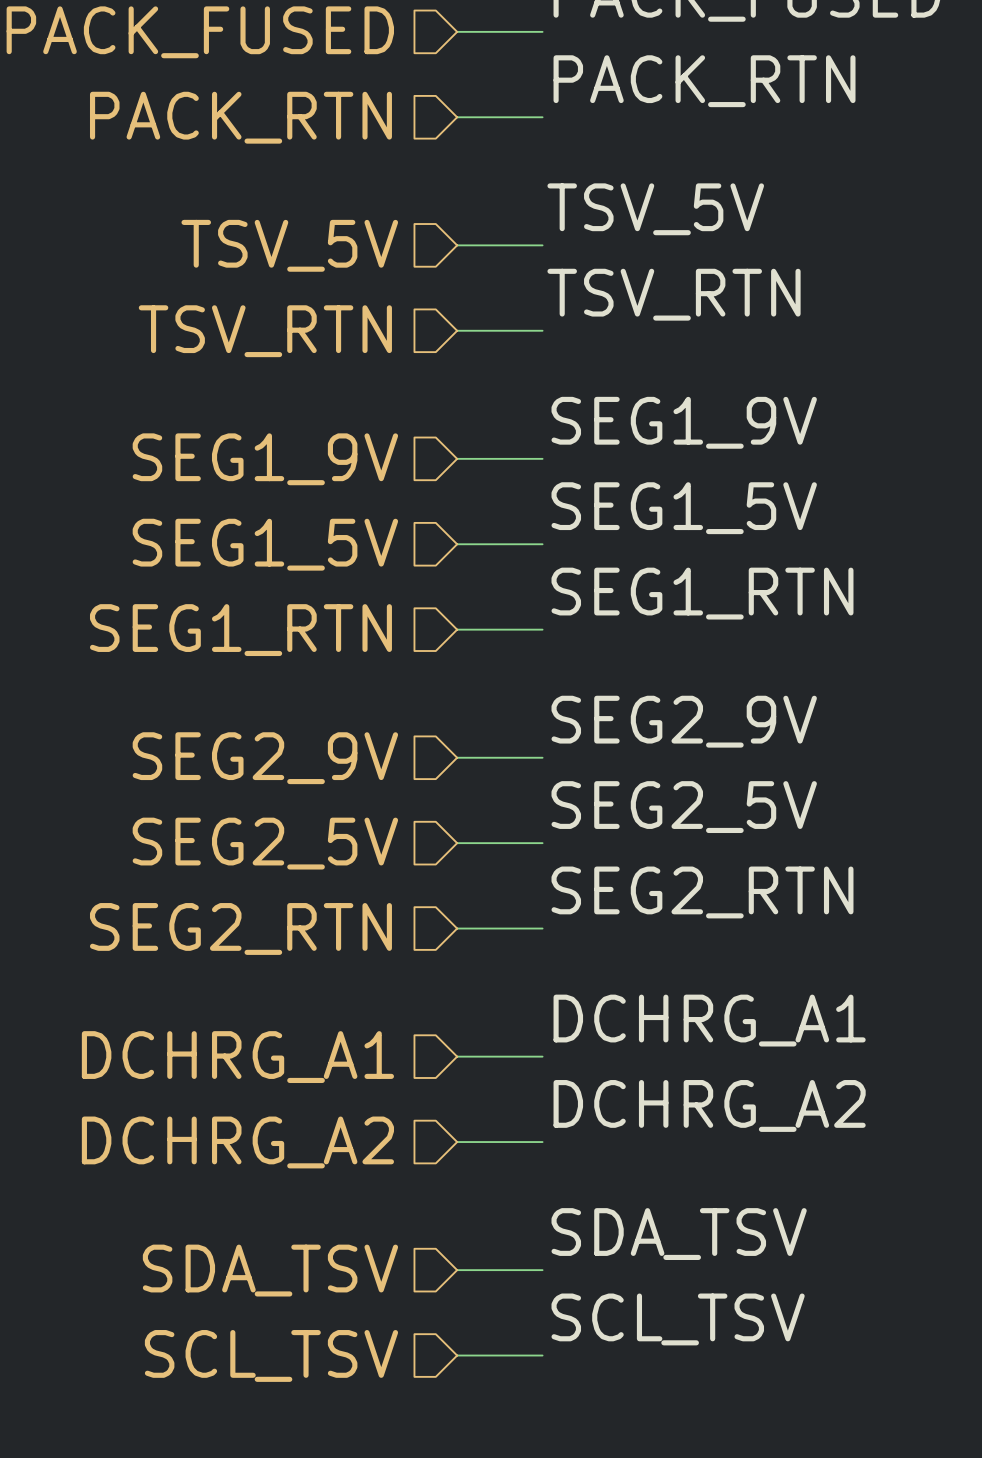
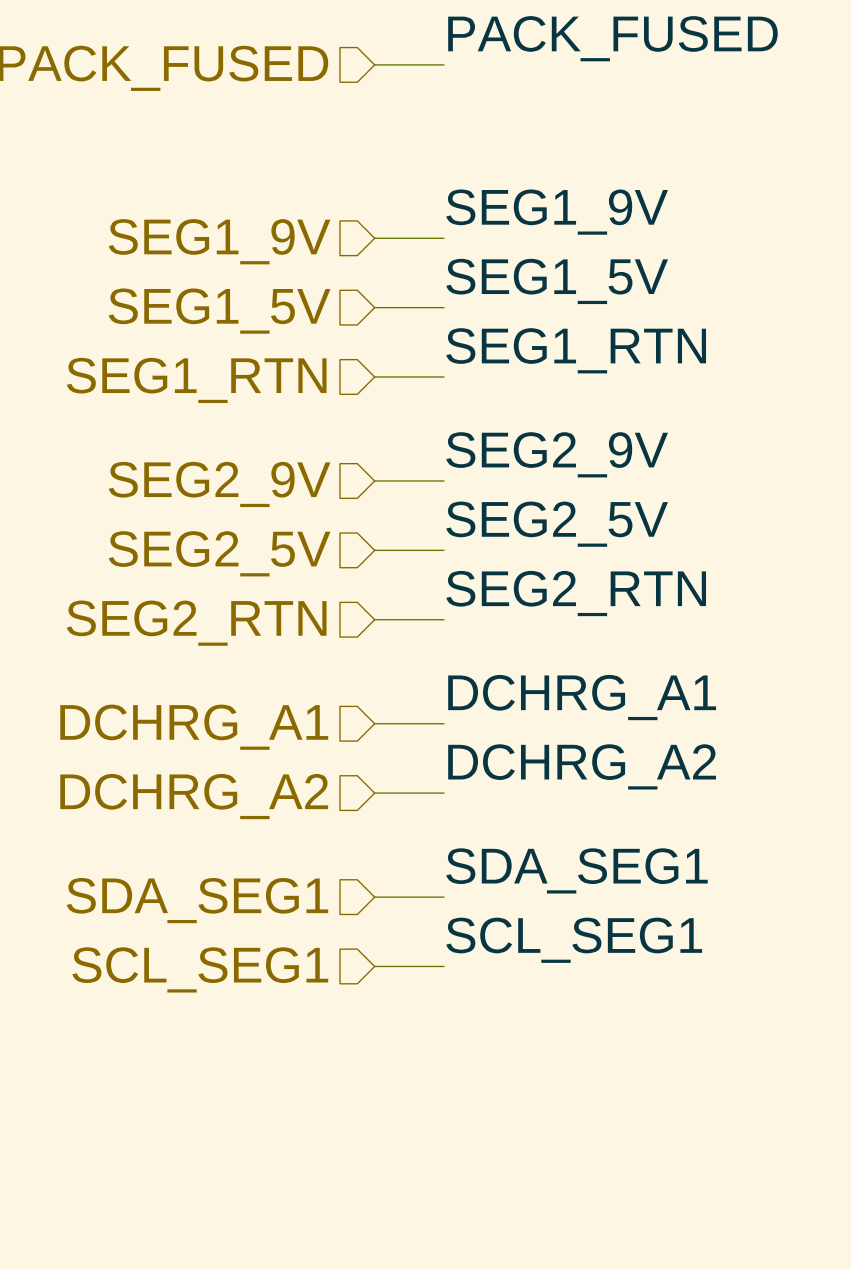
label: PACK_RTN (704, 81) -> none
hierarchical label: PACK_RTN (240, 117) -> none
wire: (457, 117) (542, 117) -> none
label: TSV_5V (655, 209) -> SEG1_9V (557, 212)
hierarchical label: TSV_5V (289, 245) -> SEG1_9V (219, 241)
label: TSV_RTN (674, 294) -> SEG1_5V (557, 281)
hierarchical label: TSV_RTN (265, 331) -> SEG1_5V (219, 311)
label: SEG1_9V (684, 422) -> SEG1_RTN (576, 350)
wire: (457, 458) (542, 458) -> (374, 376) (444, 376)
hierarchical label: SEG1_9V (265, 459) -> SEG1_RTN (196, 380)
label: SEG1_5V (684, 508) -> SEG2_9V (557, 454)
hierarchical label: SEG1_5V (265, 544) -> SEG2_9V (219, 484)
label: SEG1_RTN (702, 593) -> SEG2_5V (557, 524)
hierarchical label: SEG1_RTN (240, 630) -> SEG2_5V (219, 553)
label: SEG2_9V (684, 721) -> SEG2_RTN (576, 593)
wire: (457, 757) (542, 757) -> (374, 619) (444, 619)
hierarchical label: SEG2_9V (265, 758) -> SEG2_RTN (196, 623)
label: SEG2_5V (684, 807) -> DCHRG_A1 (582, 697)
hierarchical label: SEG2_5V (265, 843) -> DCHRG_A1 (194, 727)
label: SEG2_RTN (702, 892) -> DCHRG_A2 (582, 766)
hierarchical label: SEG2_RTN (240, 928) -> DCHRG_A2 (194, 796)
label: DCHRG_A1 (709, 1020) -> SDA_SEG1 (577, 870)
hierarchical label: DCHRG_A1 (237, 1057) -> SDA_SEG1 (197, 900)
label: DCHRG_A2 (709, 1105) -> SCL_SEG1 (574, 940)
hierarchical label: DCHRG_A2 (237, 1142) -> SCL_SEG1 (200, 969)
label: SDA_TSV (679, 1234) -> none
hierarchical label: SDA_TSV (270, 1270) -> none
wire: (457, 1270) (542, 1270) -> none
label: SCL_TSV (678, 1319) -> none
hierarchical label: SCL_TSV (271, 1355) -> none
wire: (457, 1355) (542, 1355) -> none

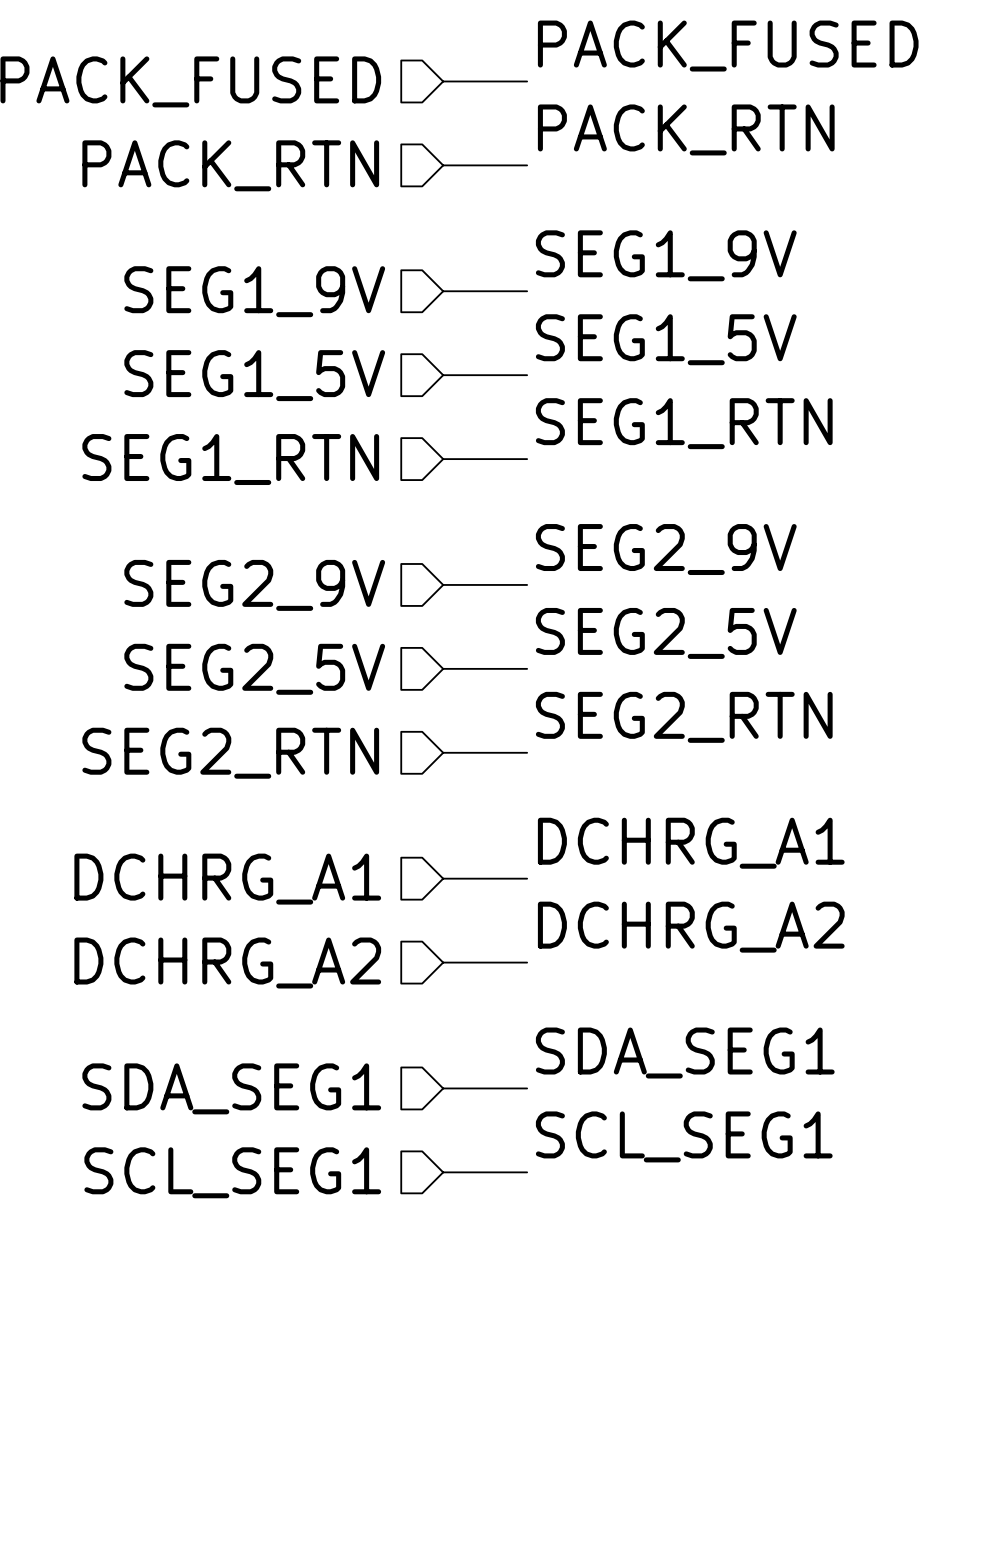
label: none -> PACK_RTN (686, 129)
wire: none -> (443, 165) (527, 165)
hierarchical label: none -> PACK_RTN (230, 165)

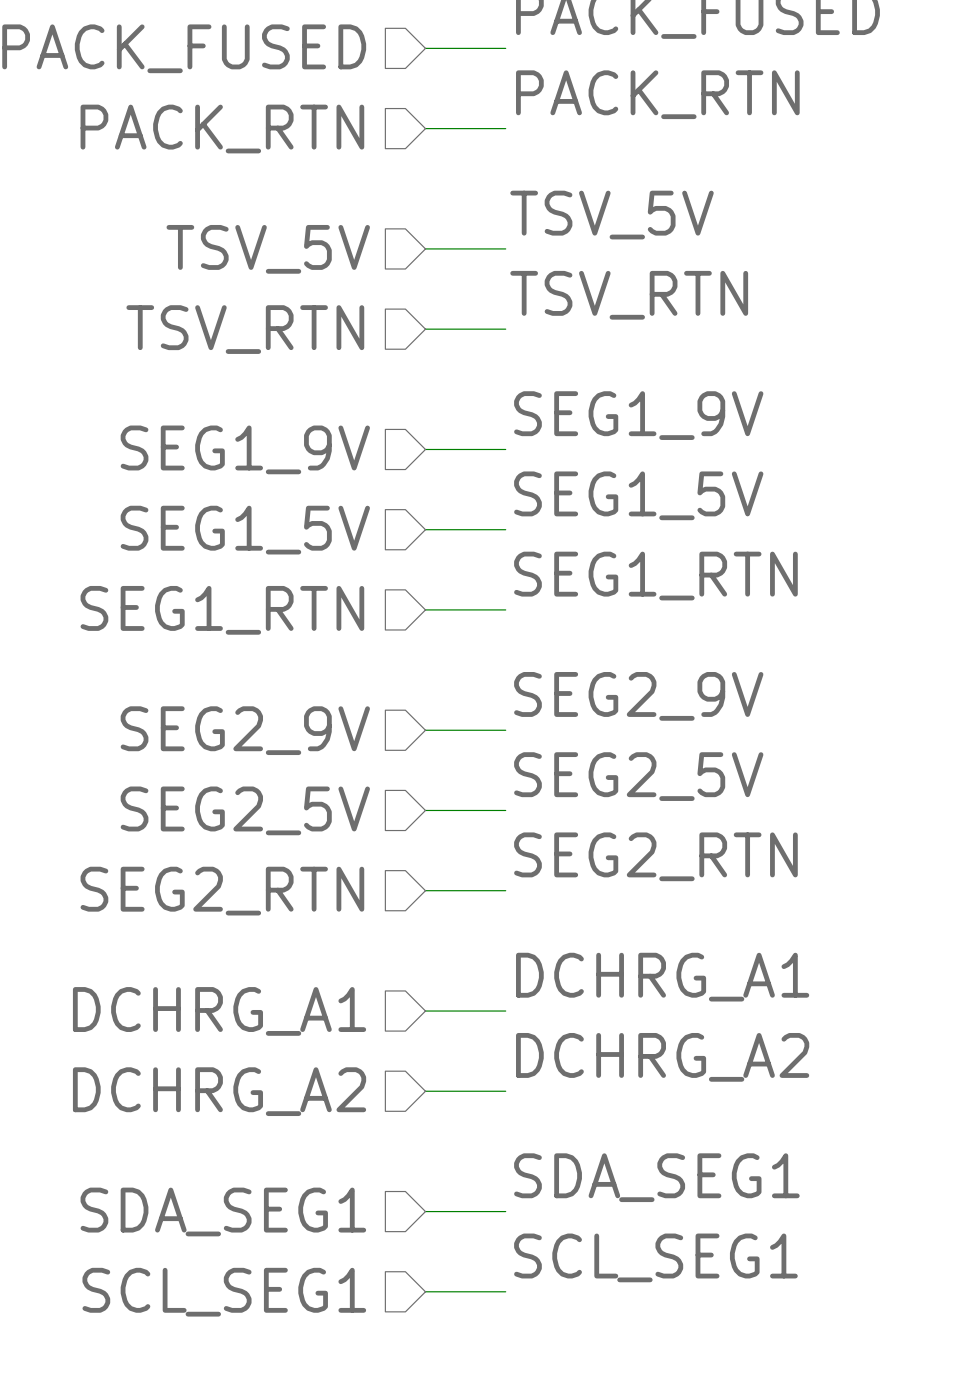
label: SEG1_9V (666, 255) -> TSV_5V (612, 215)
hierarchical label: SEG1_9V (254, 291) -> TSV_5V (268, 249)
label: SEG1_5V (666, 339) -> TSV_RTN (629, 295)
hierarchical label: SEG1_5V (254, 375) -> TSV_RTN (245, 329)
label: SEG1_RTN (684, 423) -> SEG1_9V (638, 415)
hierarchical label: SEG1_RTN (230, 459) -> SEG1_9V (245, 449)
wire: (443, 459) (527, 459) -> (425, 449) (505, 449)
label: SEG2_9V (666, 549) -> SEG1_5V (638, 495)
hierarchical label: SEG2_9V (254, 585) -> SEG1_5V (245, 530)
label: SEG2_5V (666, 633) -> SEG1_RTN (655, 576)
hierarchical label: SEG2_5V (254, 669) -> SEG1_RTN (222, 610)
label: SEG2_RTN (684, 717) -> SEG2_9V (638, 696)
wire: (443, 752) (527, 752) -> (425, 730) (505, 730)
hierarchical label: SEG2_RTN (230, 753) -> SEG2_9V (245, 730)
label: DCHRG_A1 (691, 843) -> SEG2_5V (638, 776)
hierarchical label: DCHRG_A1 (227, 879) -> SEG2_5V (245, 810)
label: DCHRG_A2 (691, 927) -> SEG2_RTN (655, 856)
hierarchical label: DCHRG_A2 (227, 963) -> SEG2_RTN (222, 891)
label: SDA_SEG1 (685, 1053) -> DCHRG_A1 (662, 977)
hierarchical label: SDA_SEG1 (231, 1088) -> DCHRG_A1 (219, 1011)
label: SCL_SEG1 (684, 1136) -> DCHRG_A2 (662, 1057)
hierarchical label: SCL_SEG1 (232, 1172) -> DCHRG_A2 (219, 1091)
label: none -> SDA_SEG1 (656, 1177)
hierarchical label: none -> SDA_SEG1 (223, 1211)
wire: none -> (425, 1211) (505, 1211)
label: none -> SCL_SEG1 (655, 1257)
hierarchical label: none -> SCL_SEG1 (224, 1292)
wire: none -> (425, 1291) (505, 1291)

